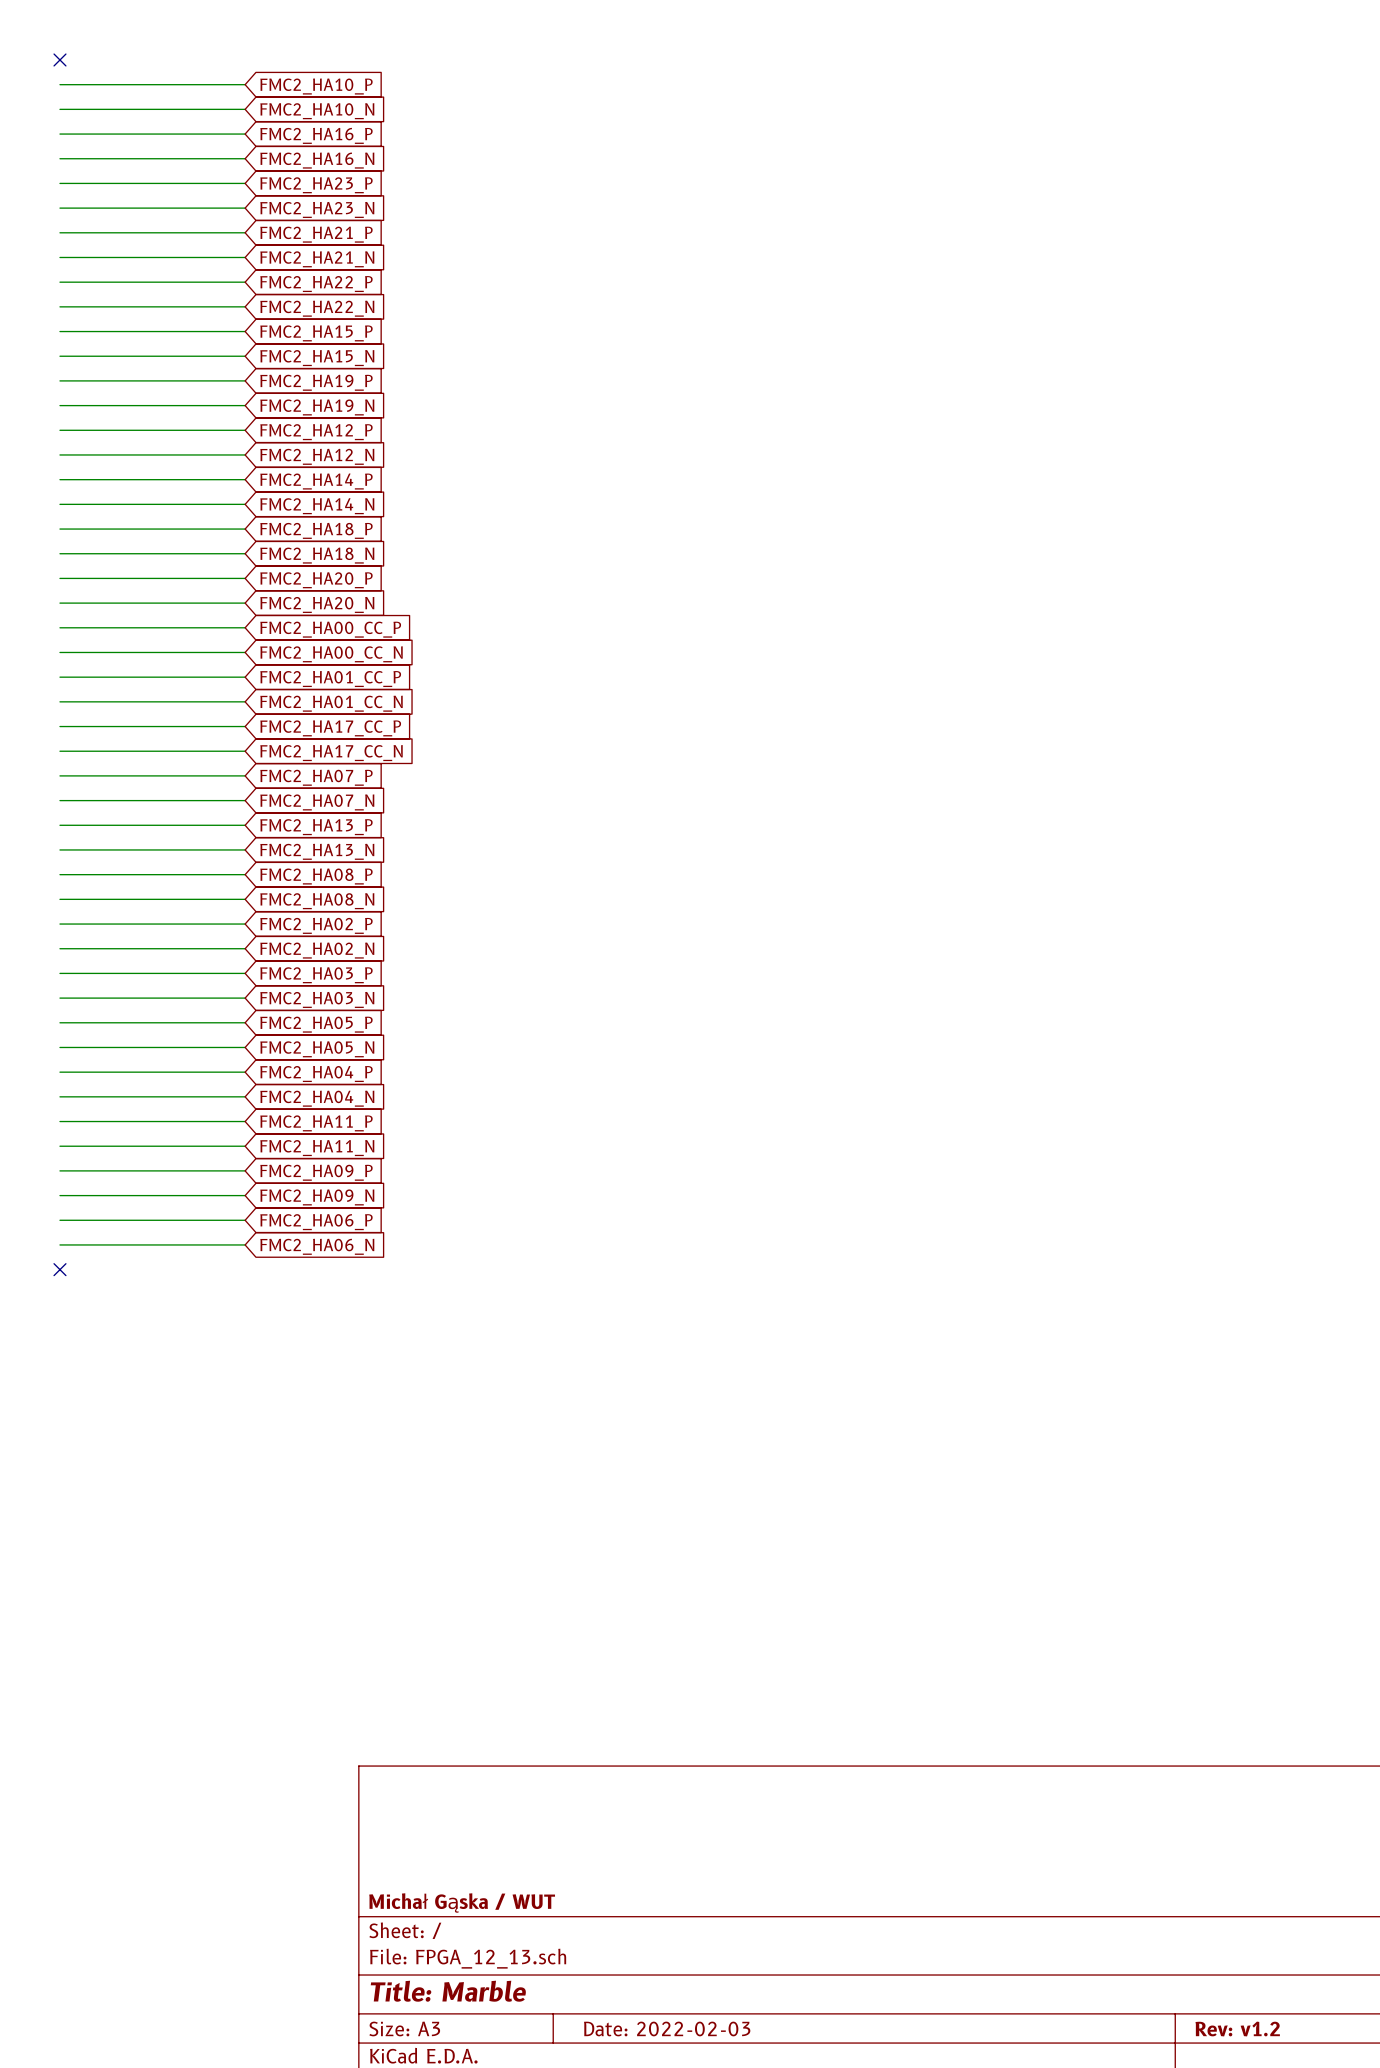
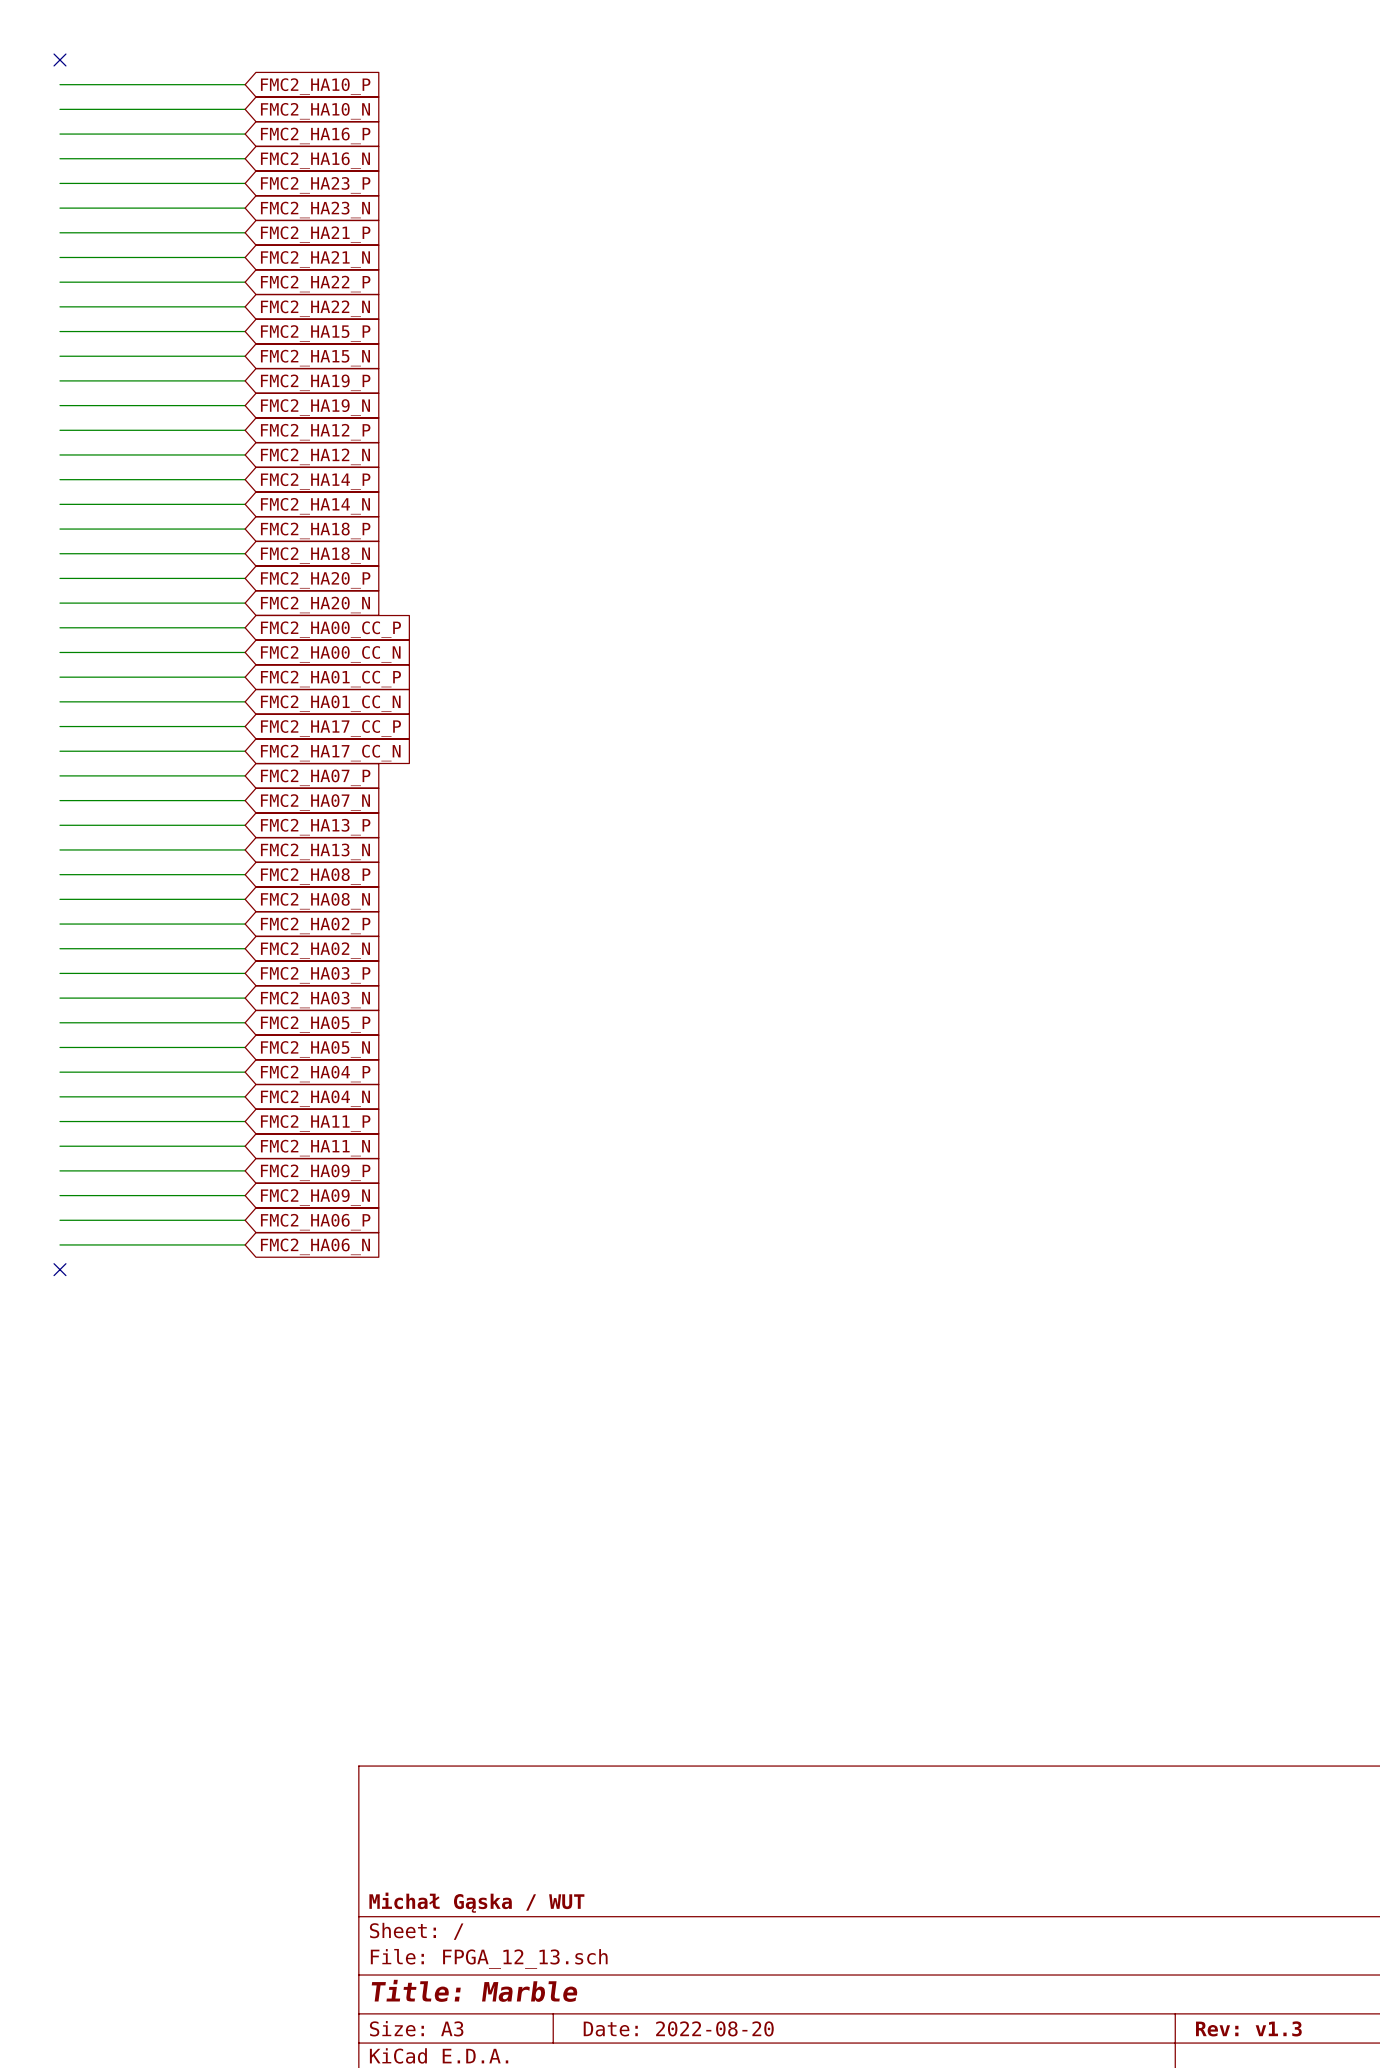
title block: Date: 2022-02-03 (667, 2028) -> Date: 2022-08-20 (678, 2028)
title block: Rev: v1.2 (1237, 2029) -> Rev: v1.3 (1248, 2028)

